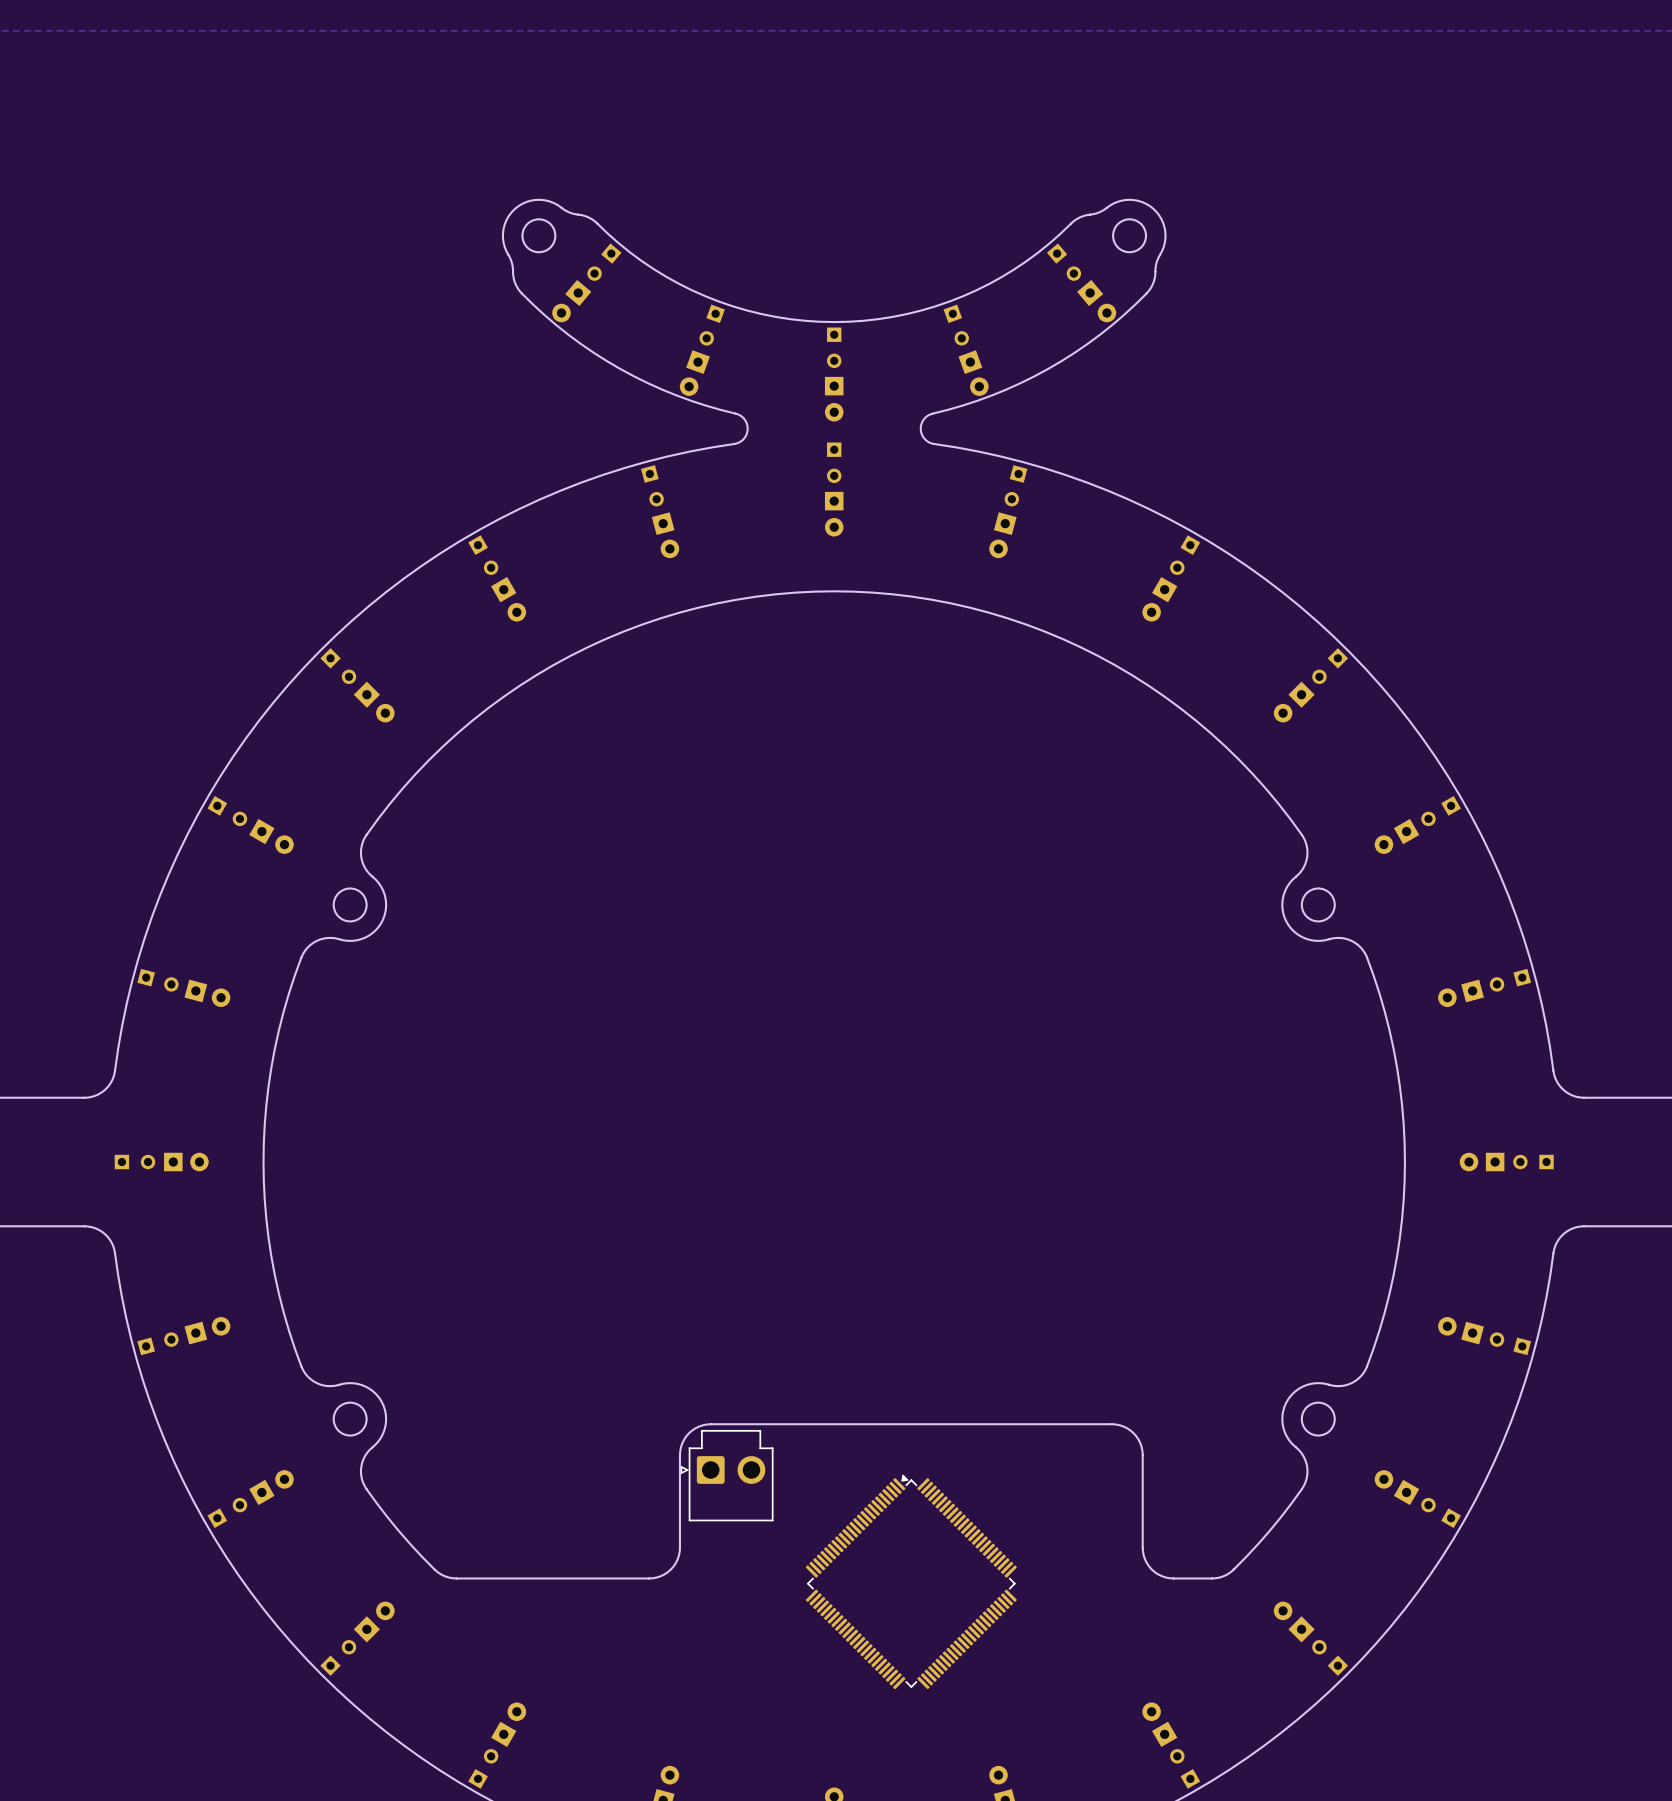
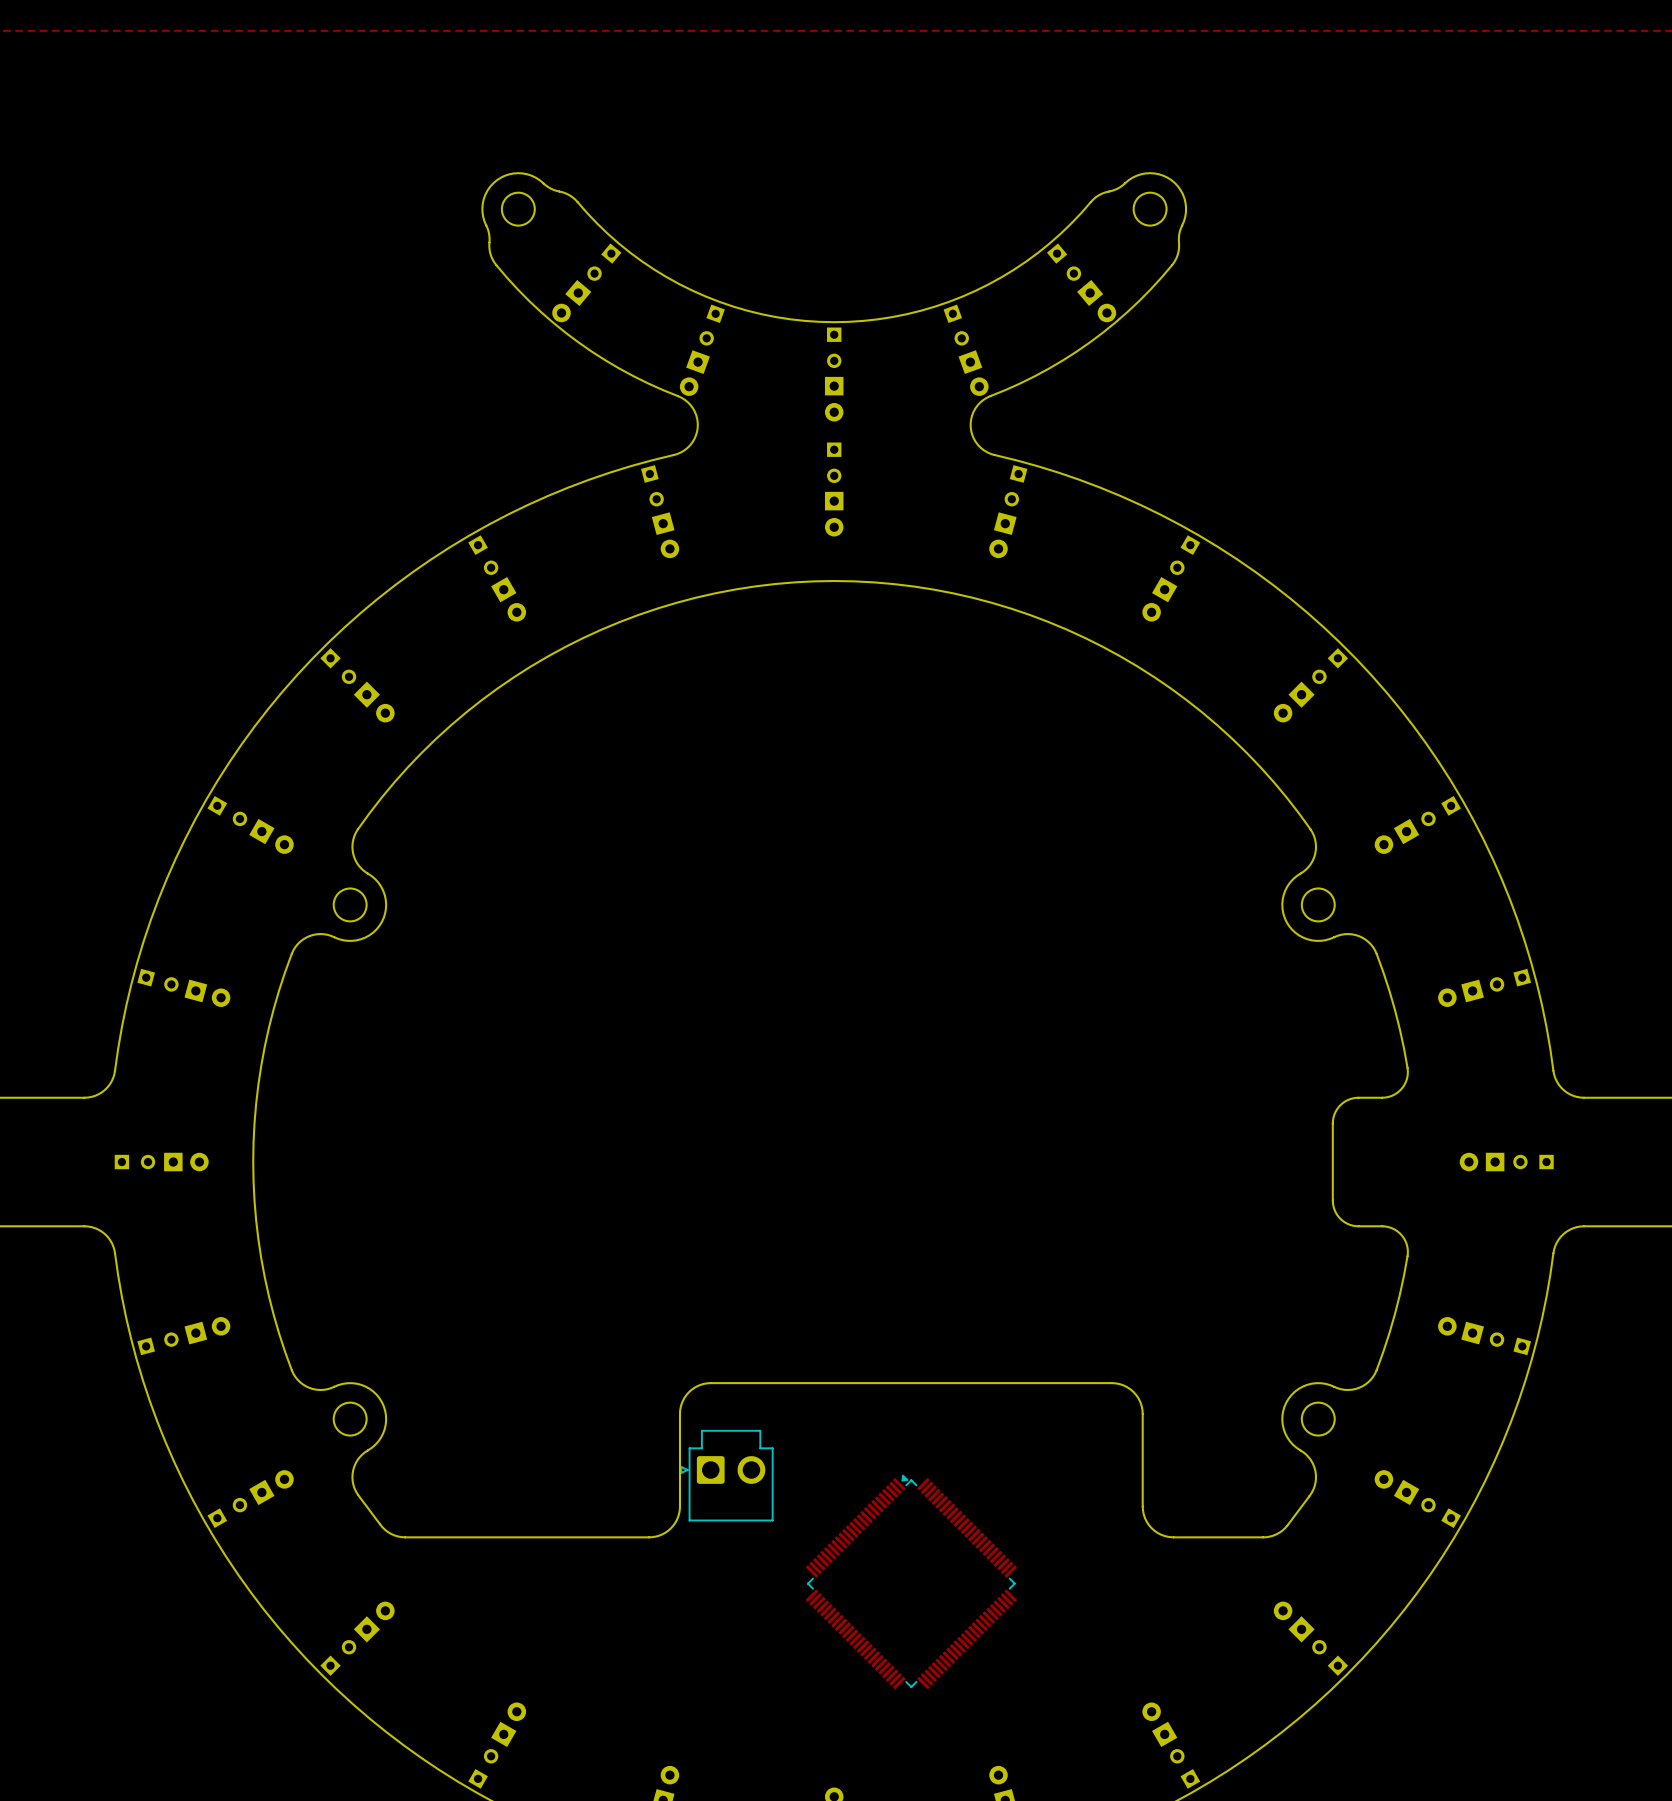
round board edge position: (538, 235) -> (518, 209)
round board edge position: (1129, 235) -> (1150, 209)
board edge: (115, 1070) (126, 1004) (137, 960) (151, 917) (177, 855) (197, 814) (232, 757) (273, 702) (318, 652) (351, 621) (403, 578) (459, 541) (499, 519) (560, 490) (602, 474) (667, 456) (736, 443) (746, 435) (747, 425) (741, 416) (676, 395) (633, 376) (580, 343) (532, 304) (516, 286) (511, 262) (503, 242) (504, 223) (515, 208) (526, 201) (545, 200) (569, 212) (588, 217) (630, 252) (654, 269) (692, 290) (719, 301) (776, 316) (834, 322) (892, 316) (935, 306) (962, 296) (1001, 277) (1026, 261) (1076, 219) (1099, 212) (1118, 201) (1127, 199) (1141, 201) (1149, 205) (1159, 215) (1164, 228) (1163, 246) (1156, 262) (1154, 280) (1148, 291) (1100, 334) (1048, 368) (992, 395) (927, 416) (921, 425) (922, 435) (932, 443) (1000, 456) (1065, 474) (1107, 490) (1169, 519) (1208, 541) (1264, 578) (1317, 621) (1349, 652) (1395, 702) (1422, 738) (1459, 795) (1481, 834) (1508, 896) (1530, 960) (1546, 1026) (1553, 1070) -> (115, 1070) (121, 1027) (137, 962) (158, 899) (175, 858) (195, 819) (229, 762) (255, 725) (297, 674) (344, 627) (377, 598) (431, 559) (468, 535) (527, 505) (568, 487) (630, 466) (677, 453) (687, 447) (694, 438) (697, 419) (687, 402) (619, 368) (578, 342) (529, 300) (494, 262) (489, 251) (489, 233) (483, 216) (483, 198) (487, 190) (496, 180) (504, 175) (518, 173) (531, 175) (550, 188) (572, 197) (607, 233) (630, 252) (654, 269) (692, 290) (733, 306) (761, 314) (790, 319) (834, 322) (877, 319) (906, 314) (962, 296) (1001, 277) (1038, 252) (1060, 233) (1098, 195) (1117, 188) (1132, 177) (1145, 173) (1163, 175) (1174, 183) (1184, 198) (1185, 212) (1179, 233) (1177, 254) (1172, 265) (1139, 300) (1089, 342) (1048, 368) (980, 402) (971, 419) (973, 438) (980, 447) (990, 453) (1037, 466) (1100, 487) (1140, 505) (1199, 535) (1237, 559) (1290, 598) (1324, 627) (1371, 674) (1413, 725) (1438, 762) (1462, 799) (1492, 858) (1510, 899) (1531, 962) (1546, 1027) (1553, 1070)
board edge: (679, 1455) (682, 1443) (689, 1433) (699, 1426) (710, 1424) (1115, 1424) (1127, 1428) (1136, 1436) (1141, 1447) (1142, 1455) -> (679, 1455) (679, 1413) (683, 1400) (694, 1387) (710, 1383) (1115, 1383) (1130, 1389) (1140, 1402) (1142, 1413) (1142, 1455)
board edge: (679, 1506) (679, 1547) (677, 1559) (667, 1572) (653, 1578) (452, 1578) (437, 1572) (422, 1557) (387, 1517) (366, 1489) (361, 1478) (363, 1459) (378, 1440) (384, 1428) (385, 1415) (381, 1402) (373, 1391) (361, 1385) (348, 1383) (327, 1386) (310, 1378) (301, 1366) (288, 1330) (274, 1275) (264, 1199) (264, 1124) (271, 1067) (283, 1011) (305, 950) (313, 942) (324, 938) (352, 940) (365, 937) (376, 929) (383, 917) (386, 904) (383, 891) (367, 871) (362, 860) (361, 849) (364, 838) (390, 803) (415, 774) (472, 720) (503, 696) (553, 665) (588, 647) (642, 624) (679, 612) (736, 599) (795, 592) (834, 591) (873, 592) (931, 599) (1007, 618) (1080, 647) (1115, 665) (1164, 696) (1210, 733) (1239, 759) (1278, 803) (1303, 838) (1307, 853) (1305, 864) (1287, 887) (1282, 899) (1283, 913) (1288, 925) (1298, 935) (1311, 940) (1340, 937) (1355, 942) (1365, 954) (1373, 975) (1384, 1011) (1397, 1067) (1403, 1124) (1404, 1181) (1399, 1237) (1393, 1275) (1384, 1312) (1367, 1366) (1361, 1376) (1351, 1383) (1340, 1386) (1311, 1383) (1298, 1388) (1288, 1398) (1283, 1410) (1282, 1424) (1287, 1436) (1305, 1459) (1307, 1470) (1305, 1482) (1269, 1530) (1227, 1574) (1216, 1578) (1173, 1578) (1165, 1577) (1154, 1572) (1146, 1563) (1142, 1551) (1142, 1506) -> (679, 1506) (678, 1516) (670, 1528) (662, 1534) (652, 1537) (405, 1537) (391, 1533) (382, 1527) (356, 1491) (352, 1477) (357, 1460) (375, 1444) (383, 1433) (385, 1415) (381, 1402) (373, 1391) (356, 1383) (342, 1383) (320, 1389) (309, 1387) (300, 1382) (291, 1370) (273, 1315) (258, 1239) (253, 1181) (254, 1123) (261, 1065) (279, 990) (291, 953) (297, 944) (306, 937) (316, 934) (327, 934) (347, 940) (361, 939) (376, 929) (383, 917) (386, 904) (383, 890) (375, 879) (359, 866) (354, 857) (352, 842) (356, 832) (381, 797) (408, 767) (466, 712) (514, 677) (548, 656) (583, 637) (638, 614) (696, 597) (735, 589) (774, 584) (834, 581) (913, 586) (953, 593) (1010, 608) (1066, 629) (1102, 646) (1170, 688) (1202, 712) (1246, 752) (1286, 797) (1312, 832) (1316, 846) (1312, 860) (1306, 869) (1290, 882) (1283, 894) (1283, 913) (1288, 925) (1298, 935) (1311, 940) (1325, 940) (1344, 934) (1362, 937) (1375, 950) (1383, 972) (1404, 1048) (1407, 1071) (1406, 1080) (1399, 1090) (1391, 1095) (1355, 1097) (1344, 1101) (1335, 1112) (1332, 1123) (1332, 1200) (1336, 1214) (1344, 1222) (1352, 1225) (1391, 1228) (1401, 1235) (1407, 1246) (1407, 1256) (1399, 1294) (1376, 1370) (1370, 1379) (1359, 1387) (1344, 1389) (1325, 1383) (1311, 1383) (1298, 1388) (1286, 1402) (1282, 1415) (1285, 1433) (1293, 1444) (1311, 1460) (1315, 1478) (1311, 1493) (1287, 1525) (1279, 1532) (1263, 1537) (1169, 1537) (1161, 1535) (1151, 1528) (1145, 1518) (1142, 1506)

